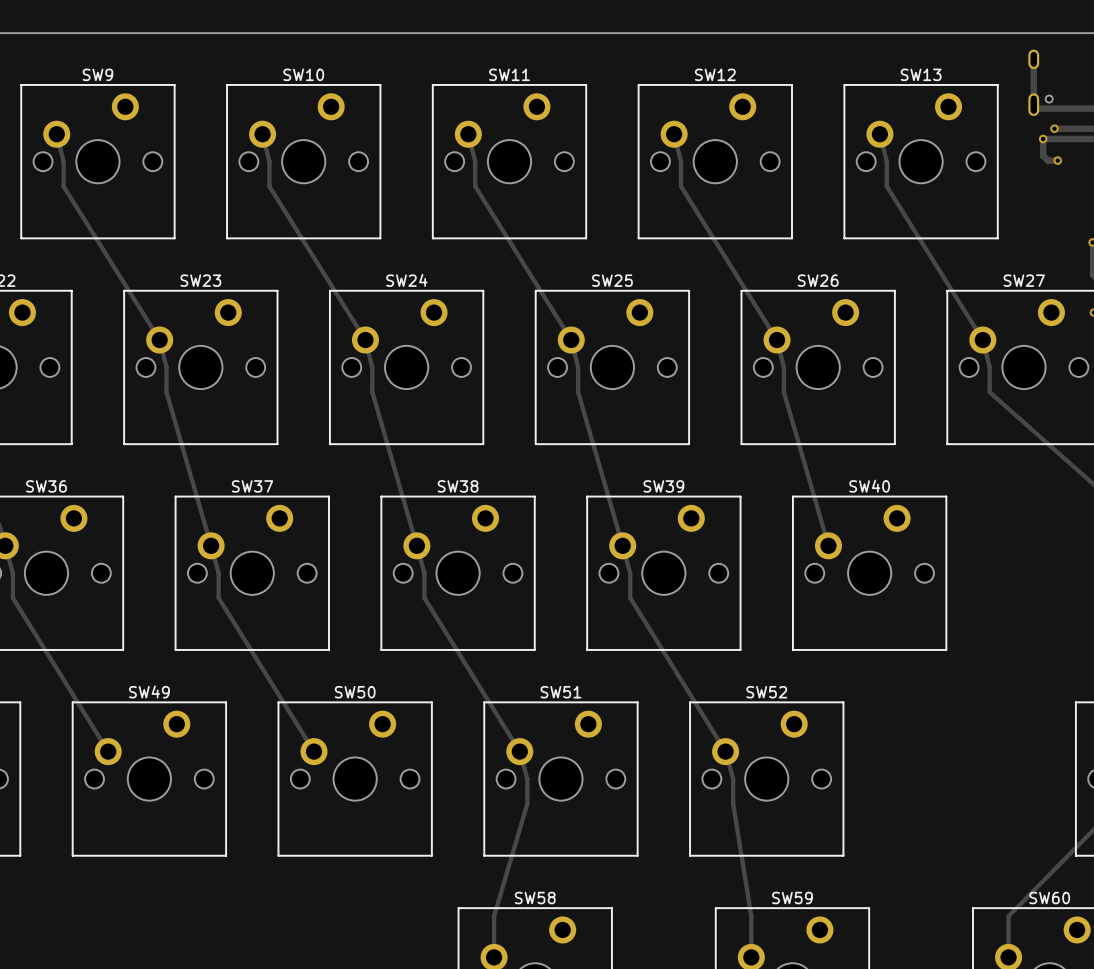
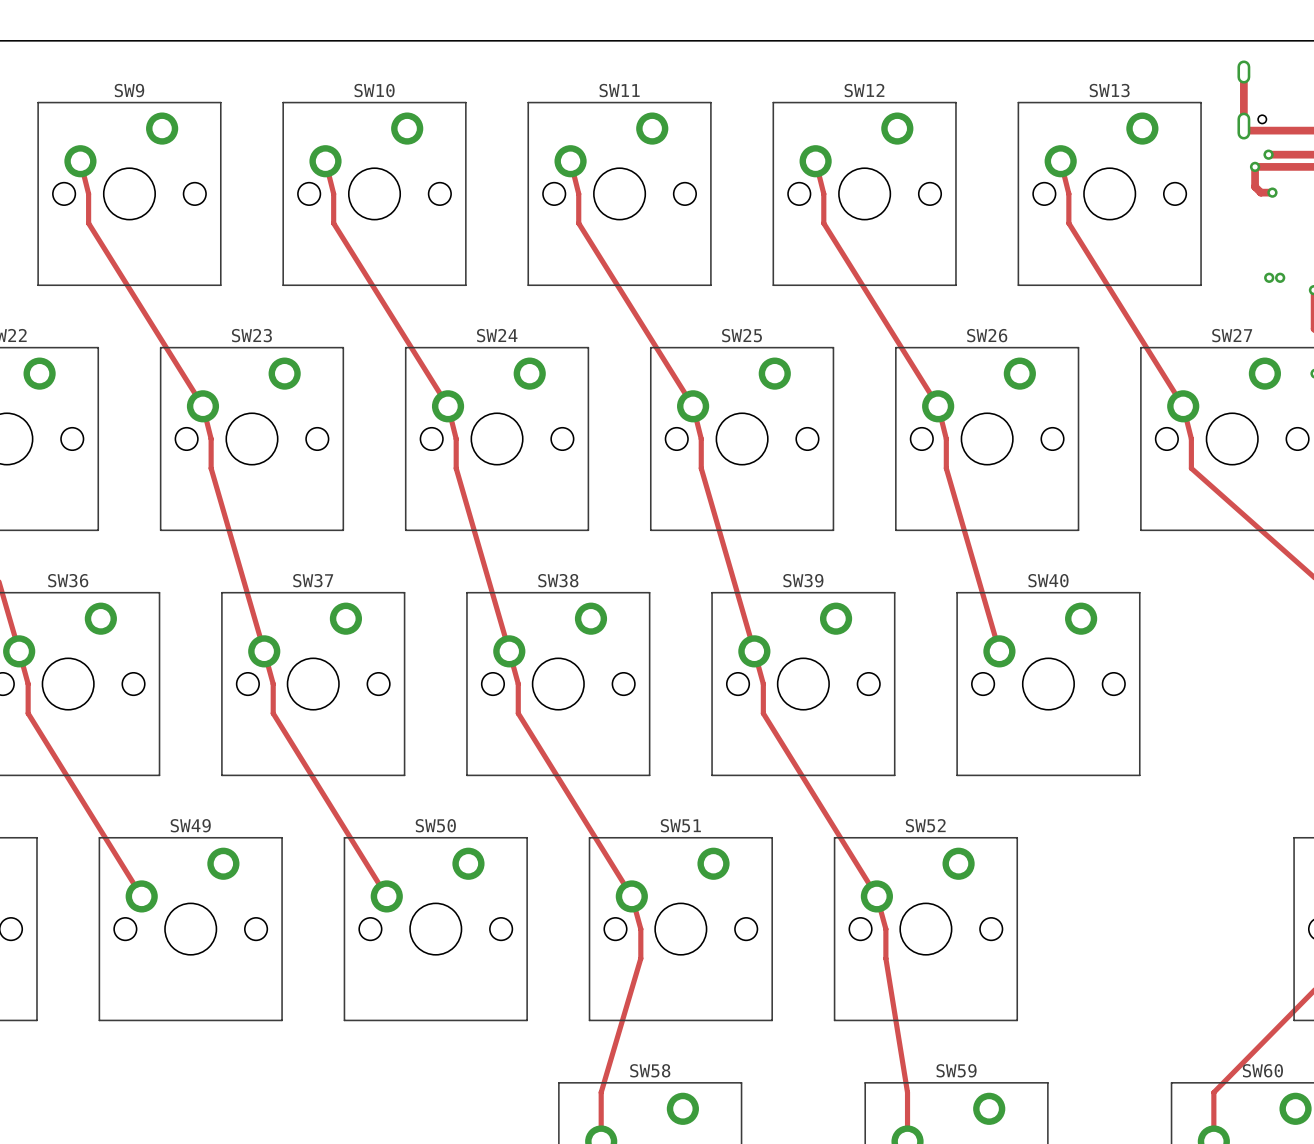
via: none -> (1269, 277)
via: none -> (1280, 277)

